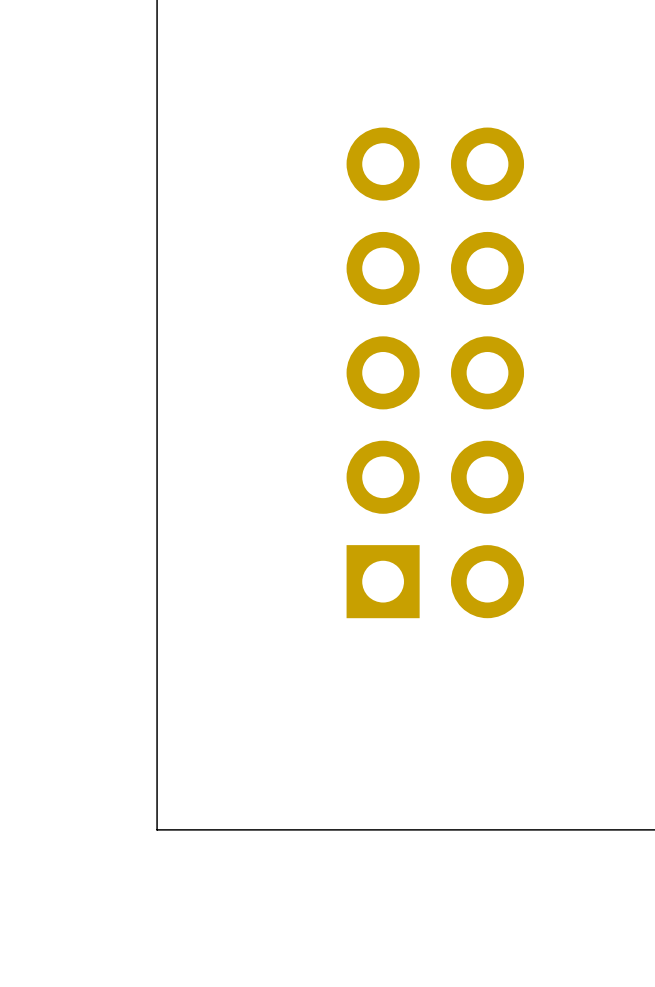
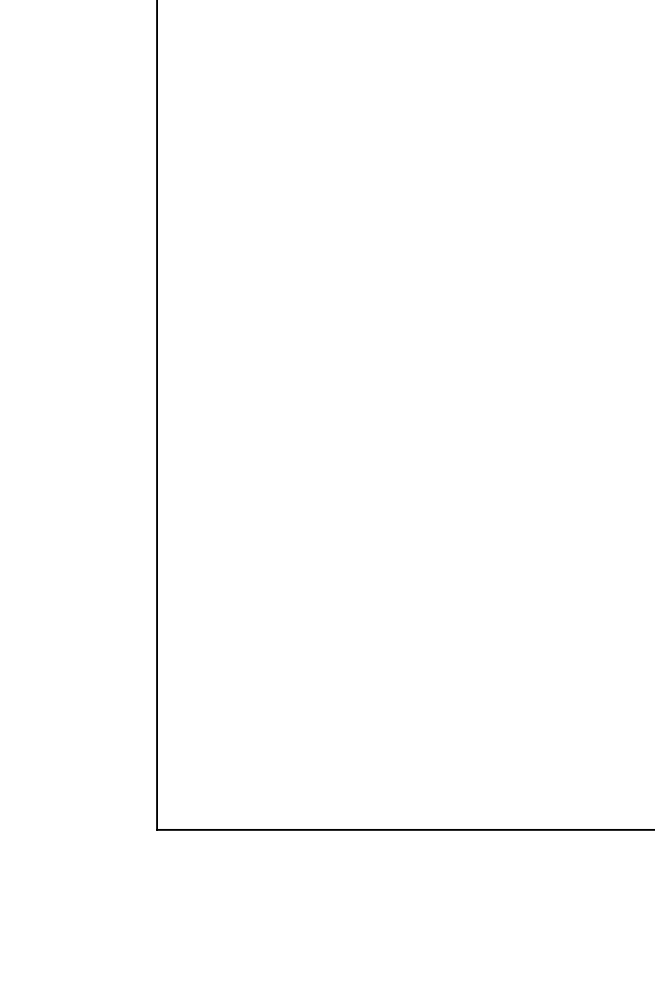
part: (435, 372) -> none

